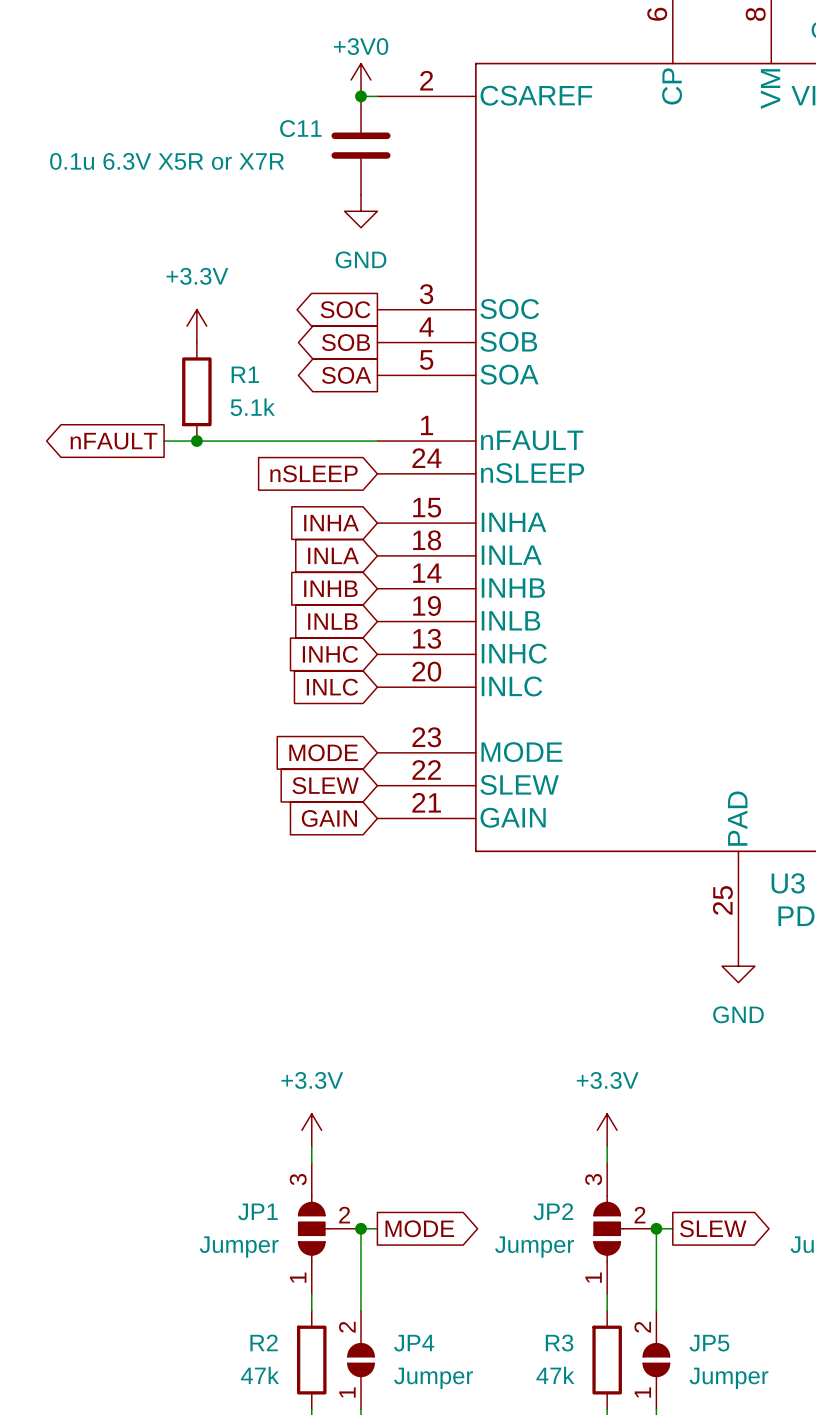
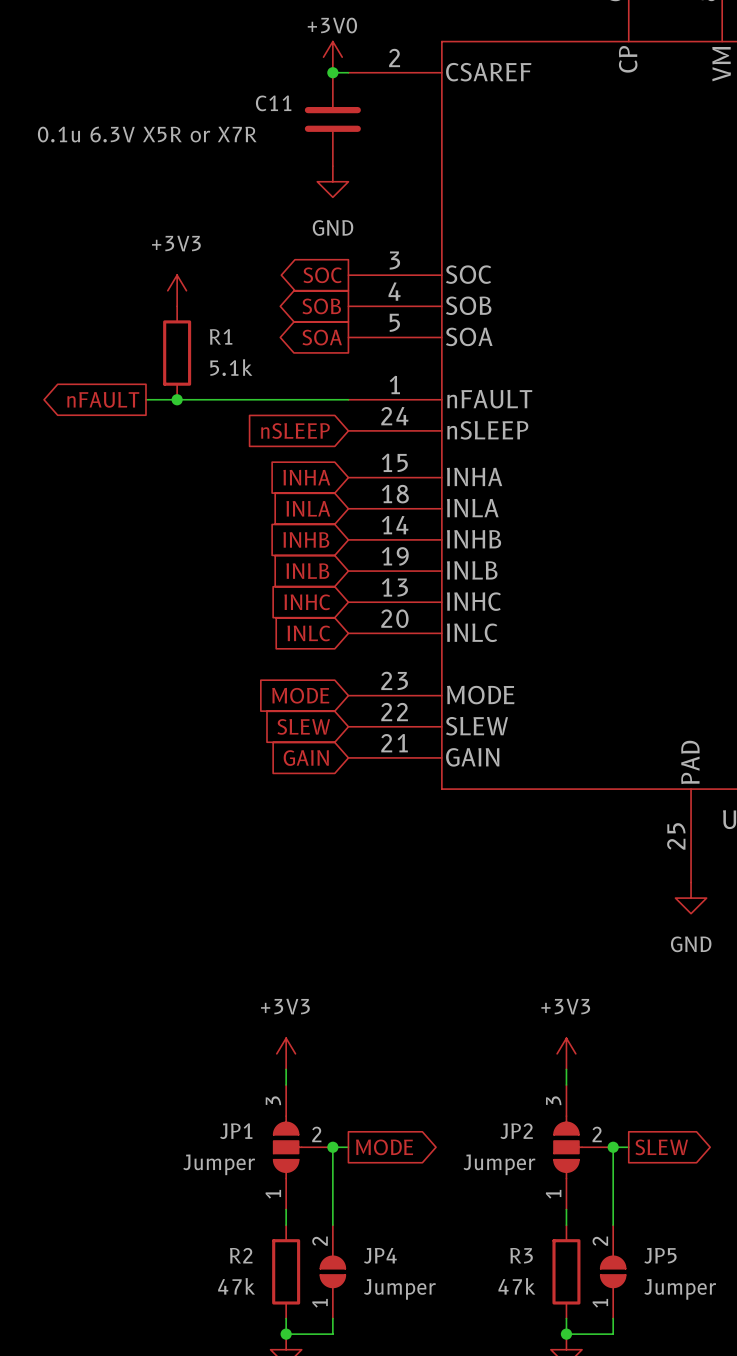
power symbol: +3.3V (196, 326) -> +3V3 (177, 290)
power symbol: +3.3V (311, 1130) -> +3V3 (286, 1053)
power symbol: +3.3V (607, 1130) -> +3V3 (566, 1053)

